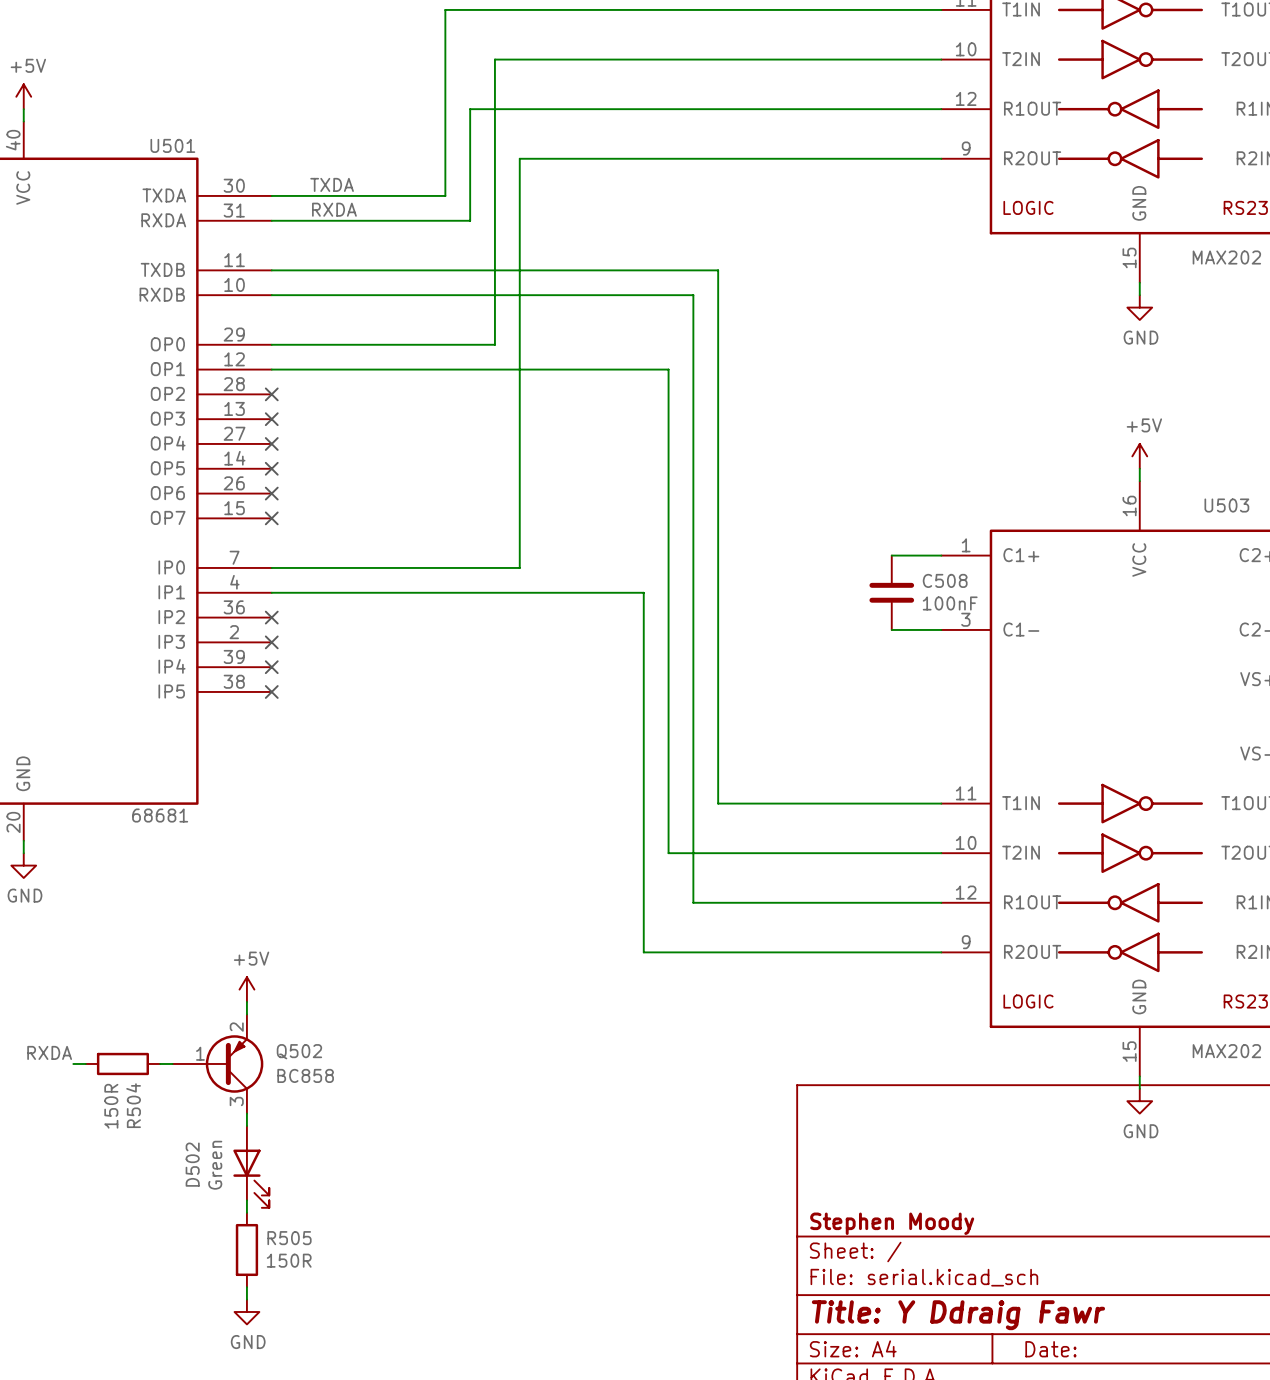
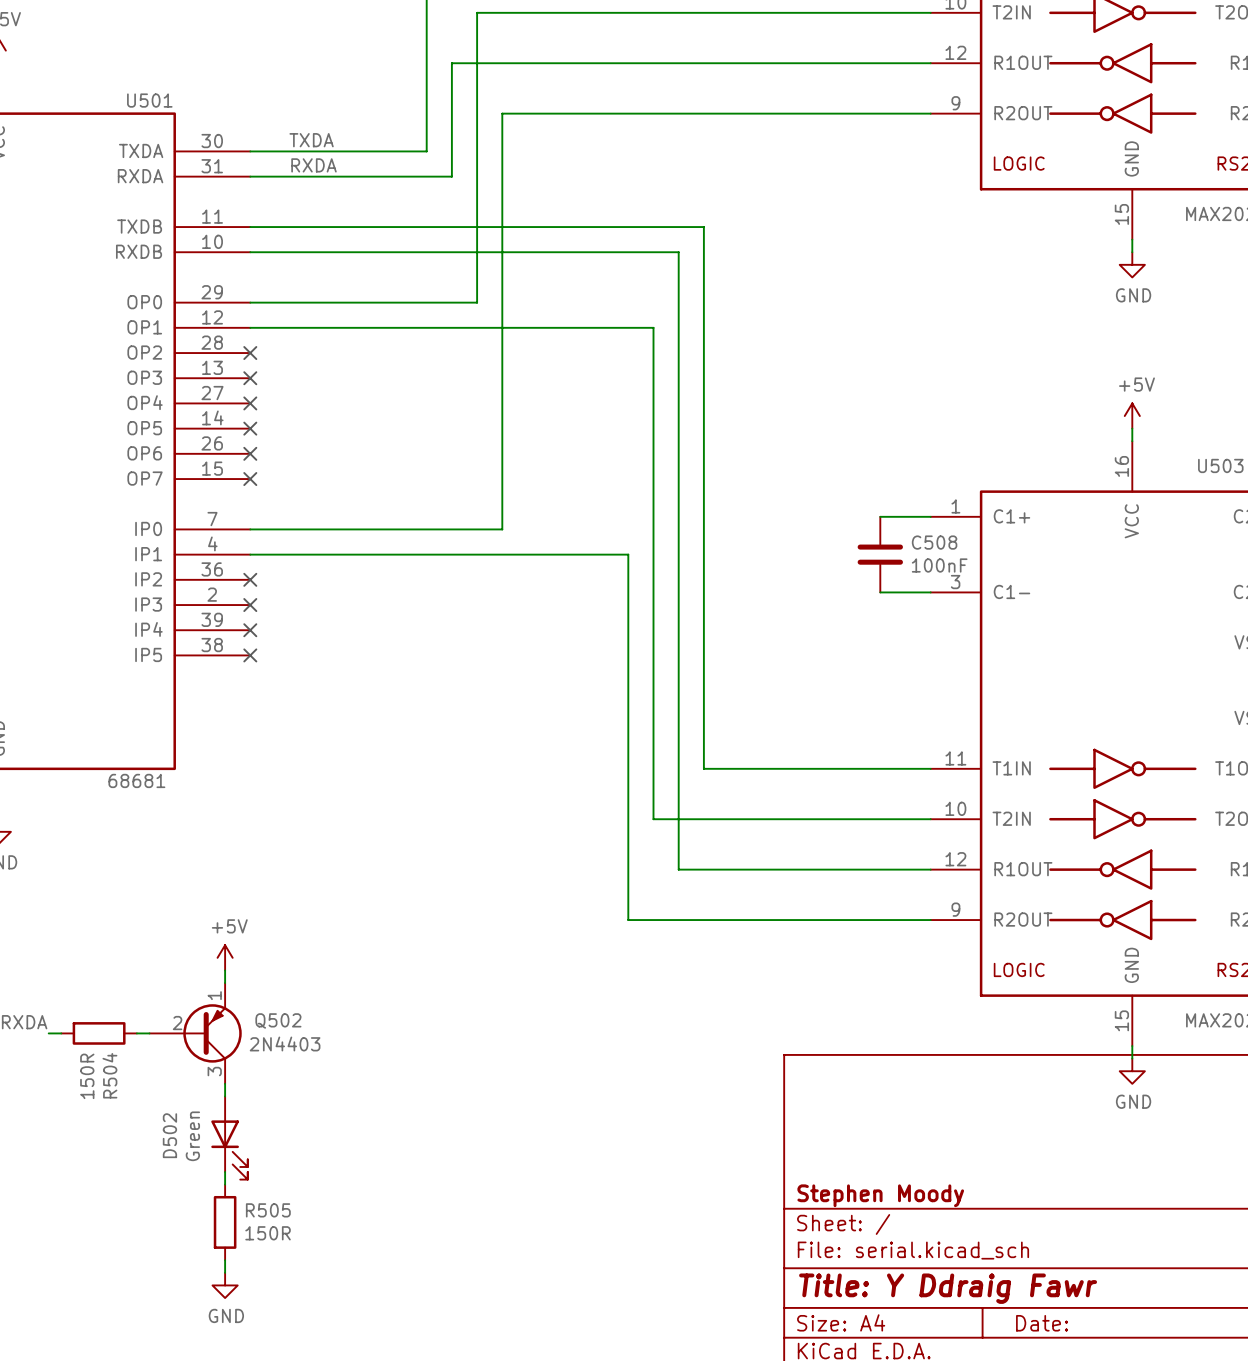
Q502 pin number: 2 (236, 1027) -> 1 (214, 995)
Q502 pin number: 1 (200, 1053) -> 2 (177, 1023)
Q502 value: BC858 (305, 1075) -> 2N4403 (285, 1044)

